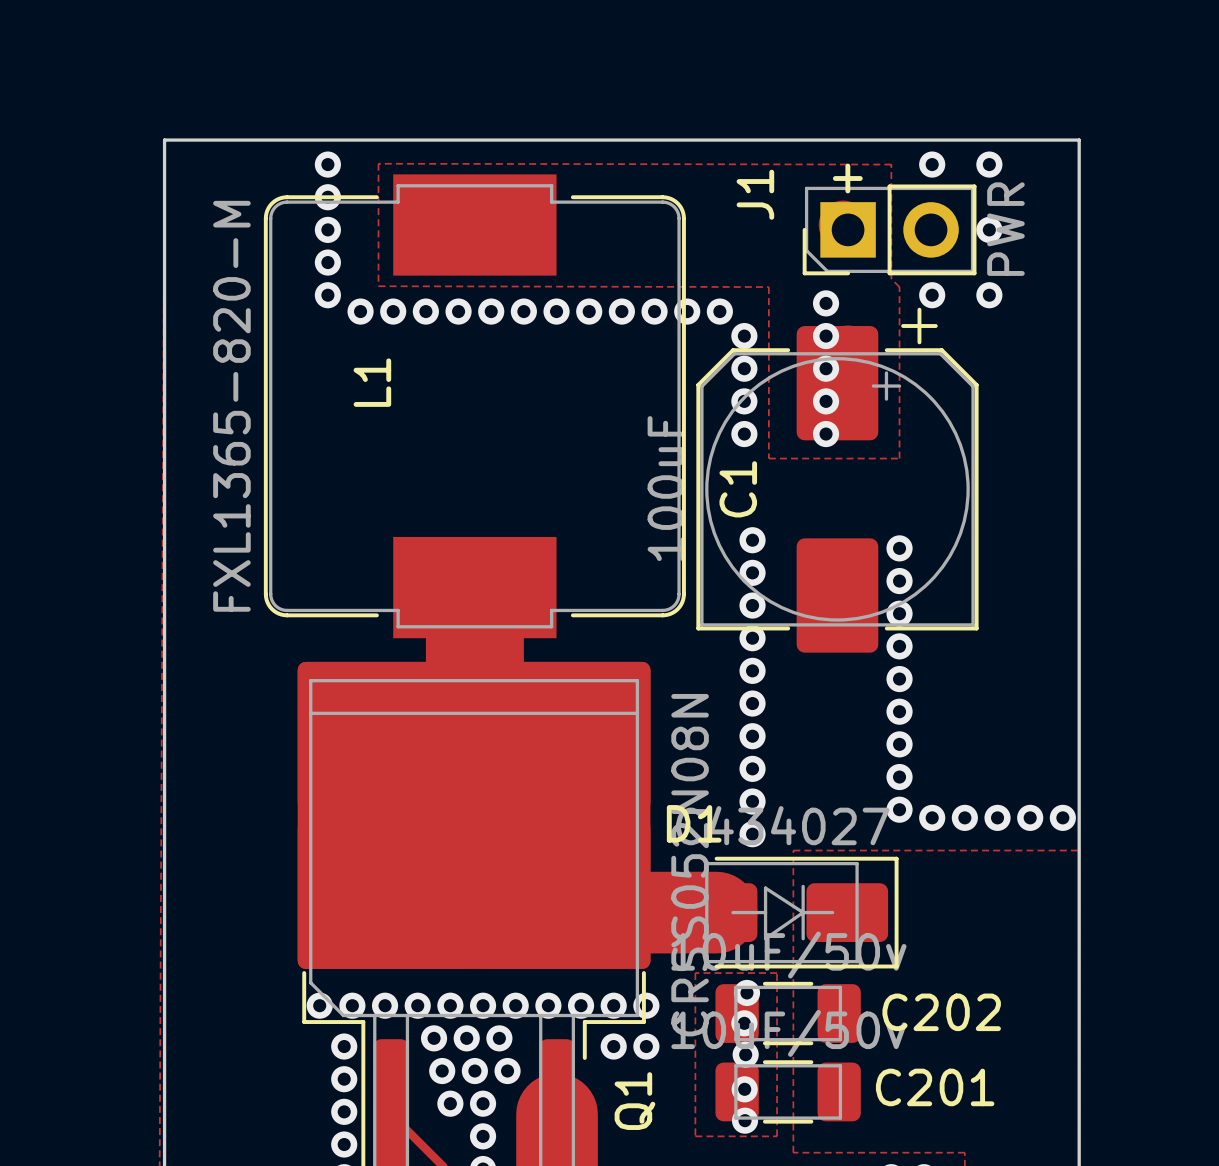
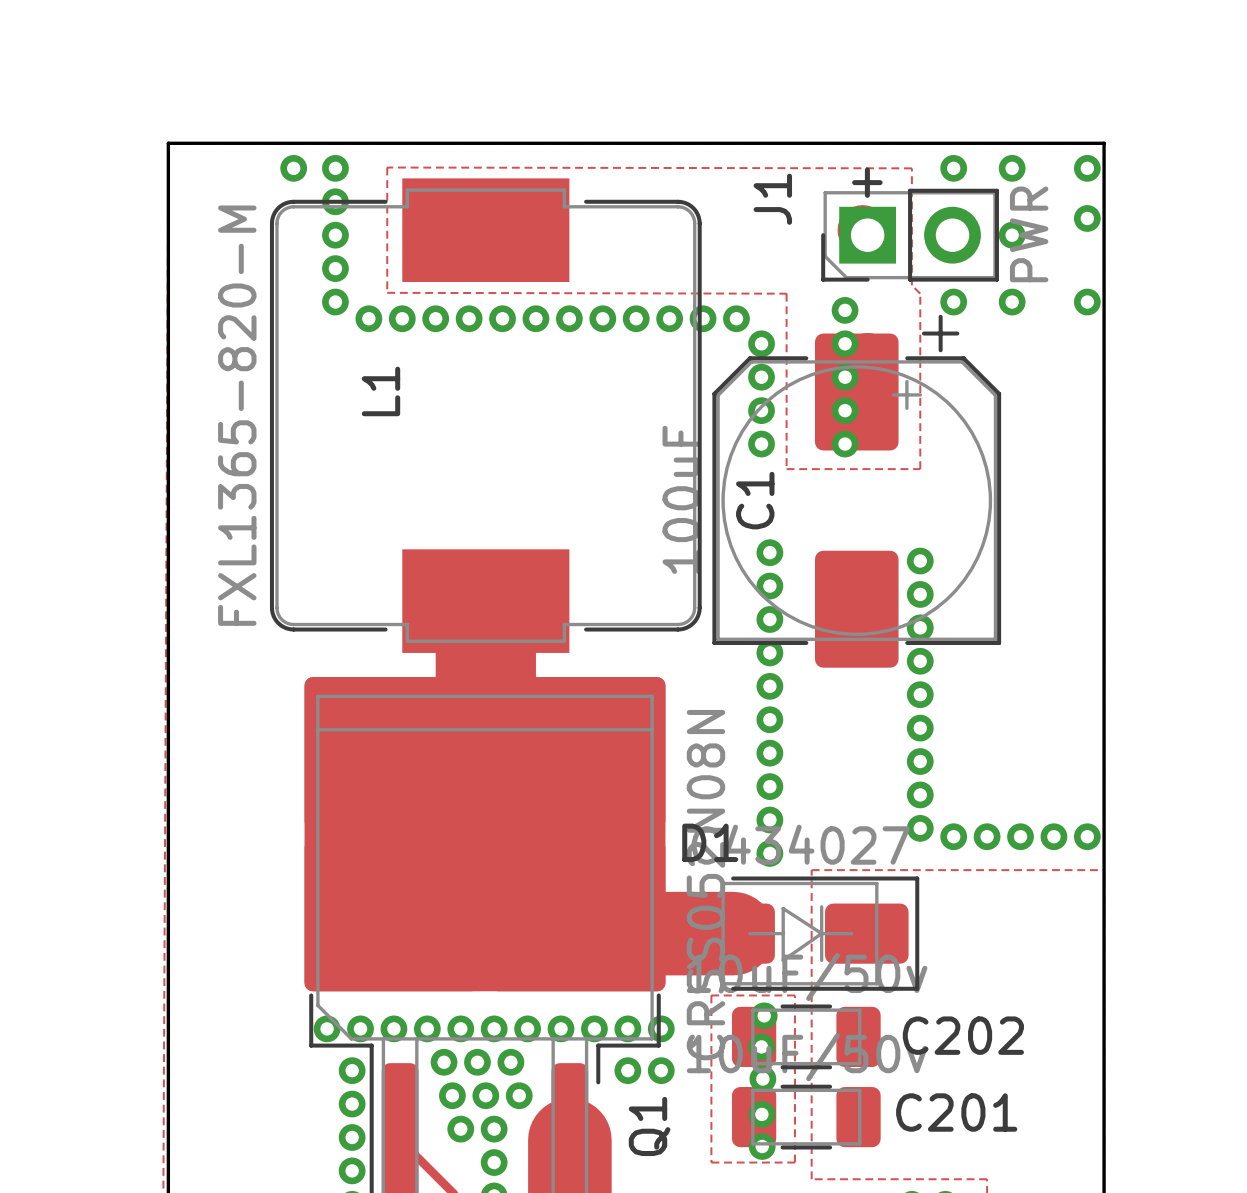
via: none -> (293, 168)
via: none -> (1087, 168)
via: none -> (1087, 218)
via: none -> (1087, 302)

